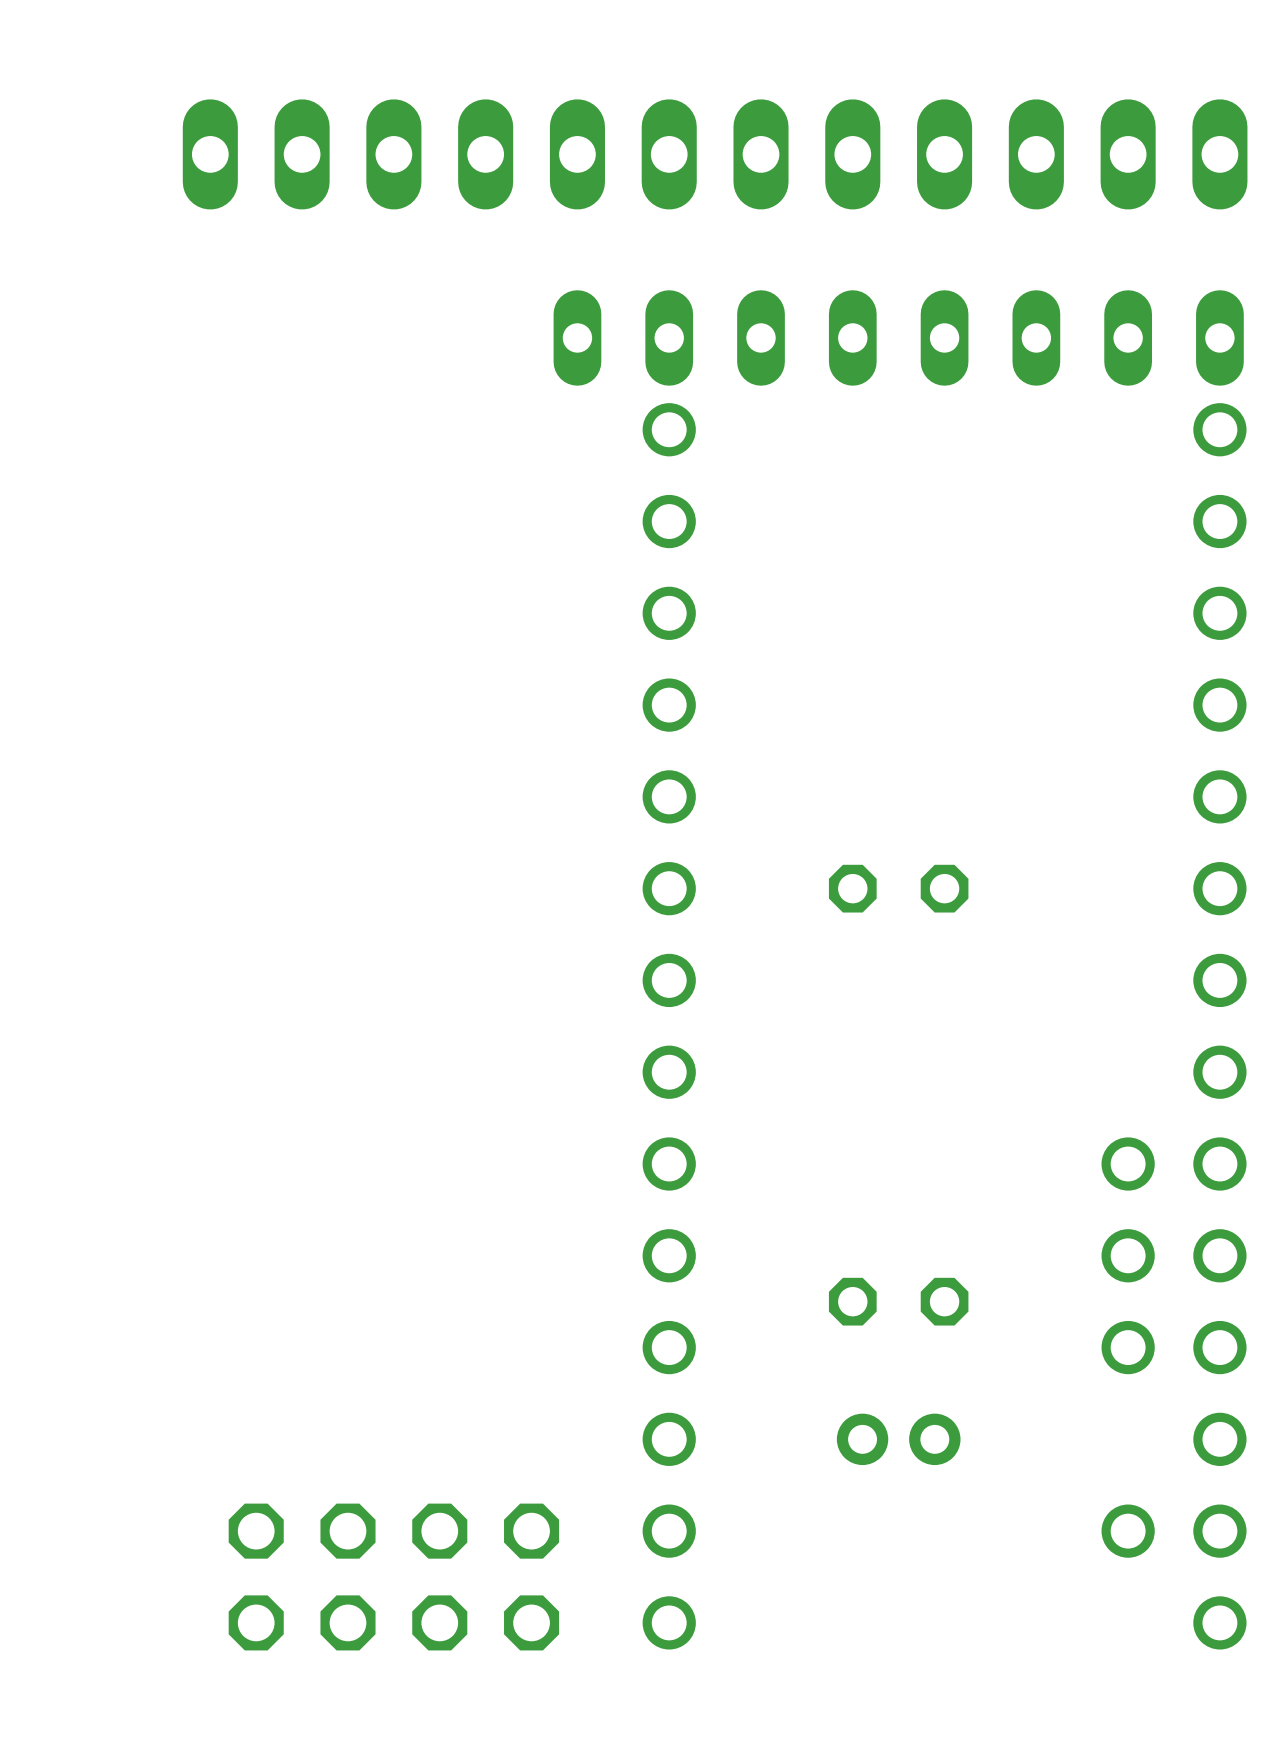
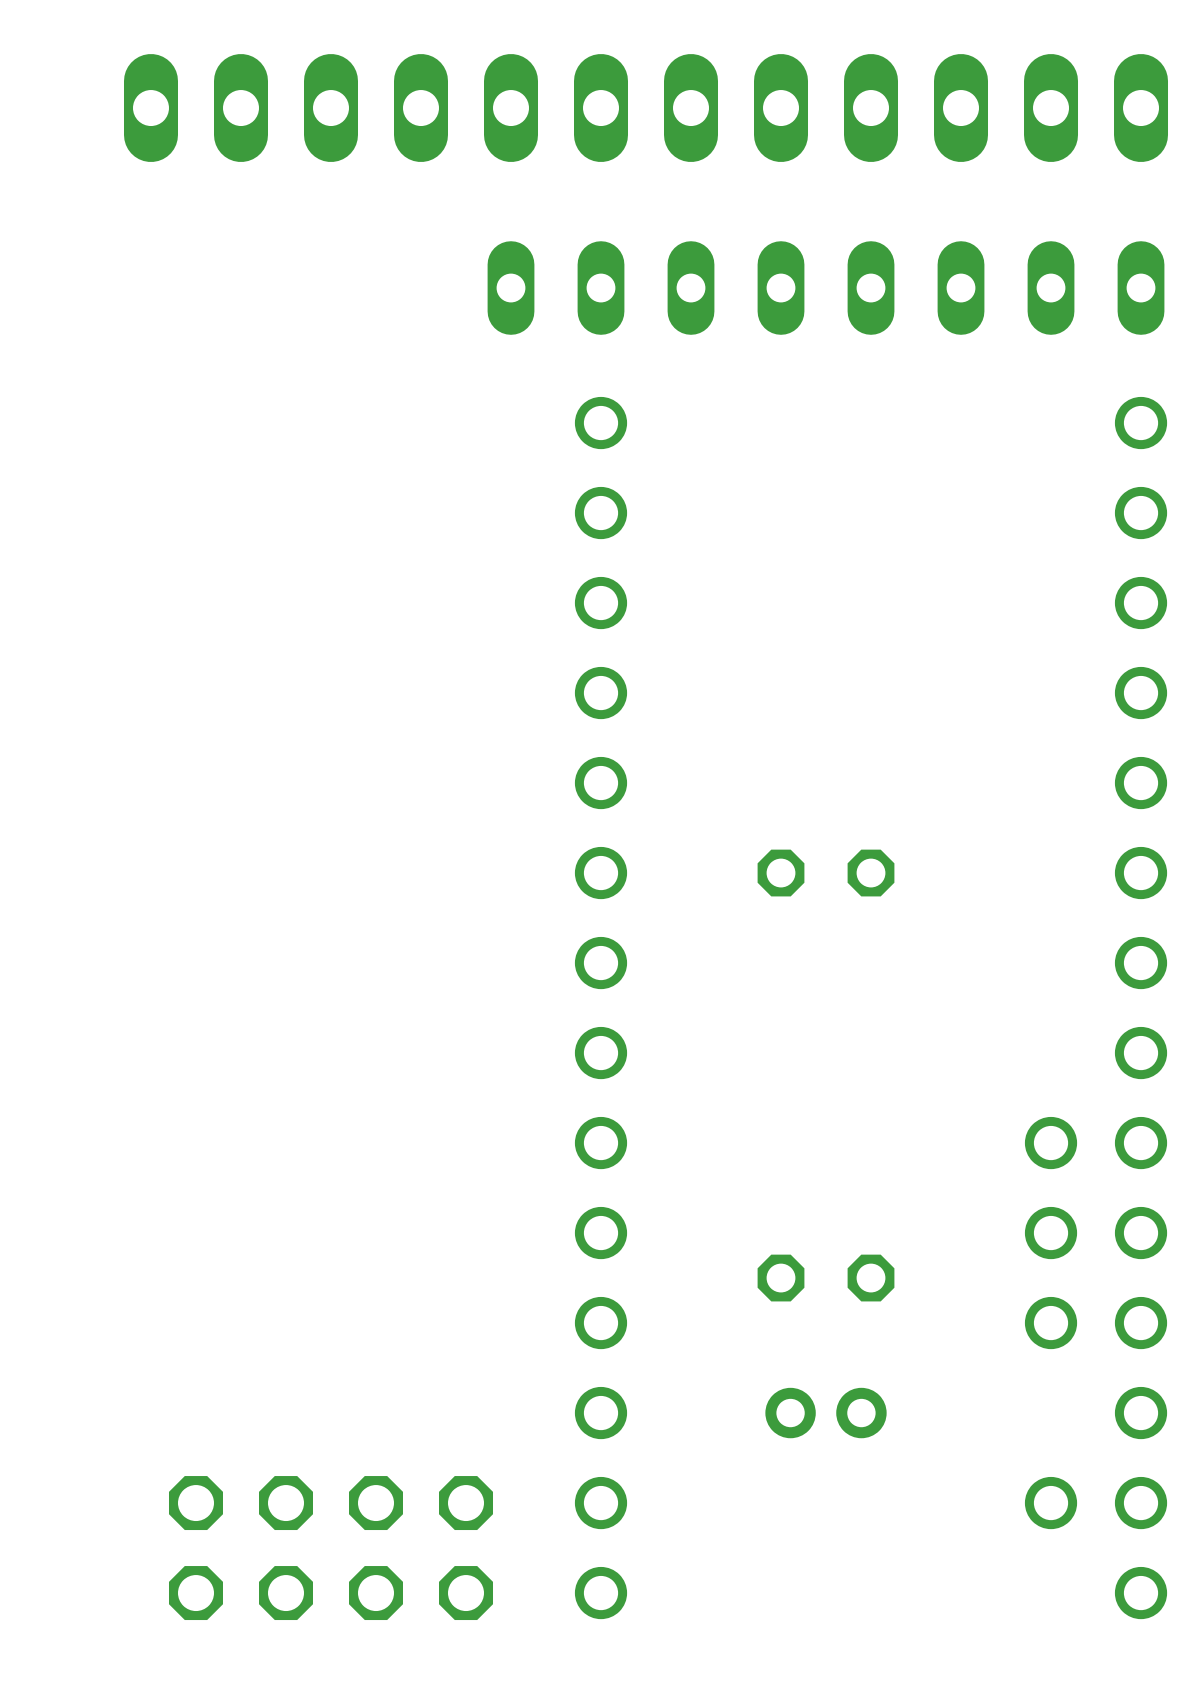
part position: (715, 154) -> (646, 108)
part position: (898, 337) -> (826, 288)

